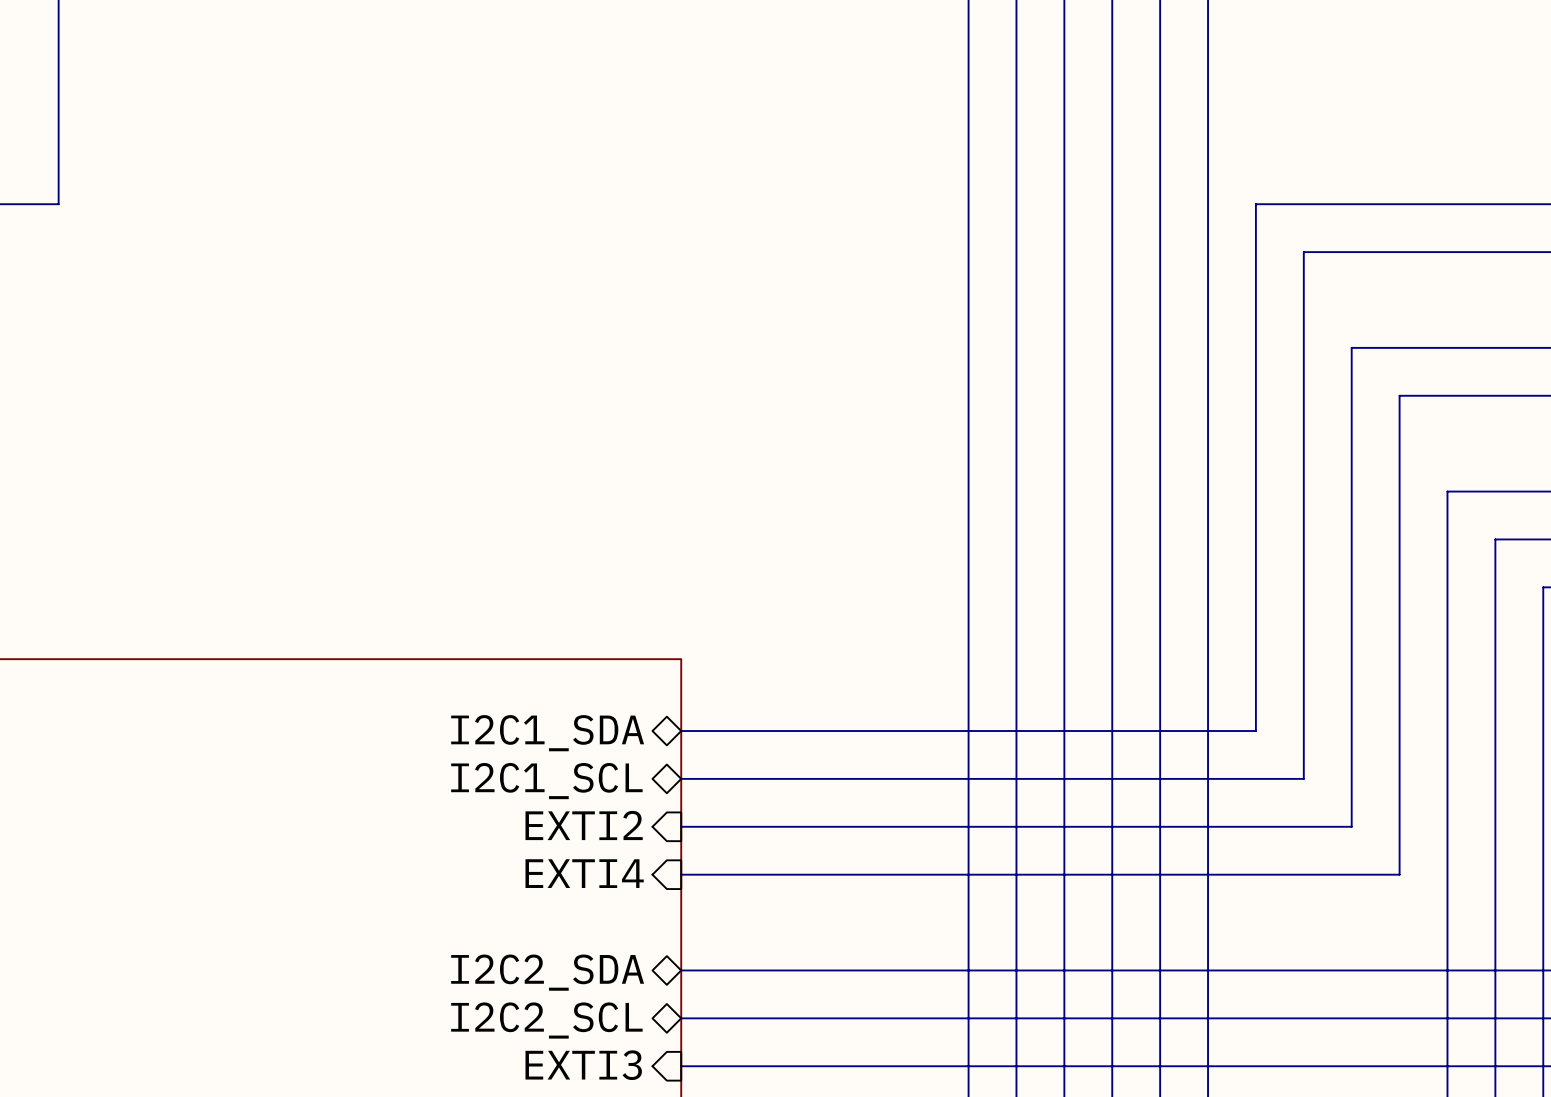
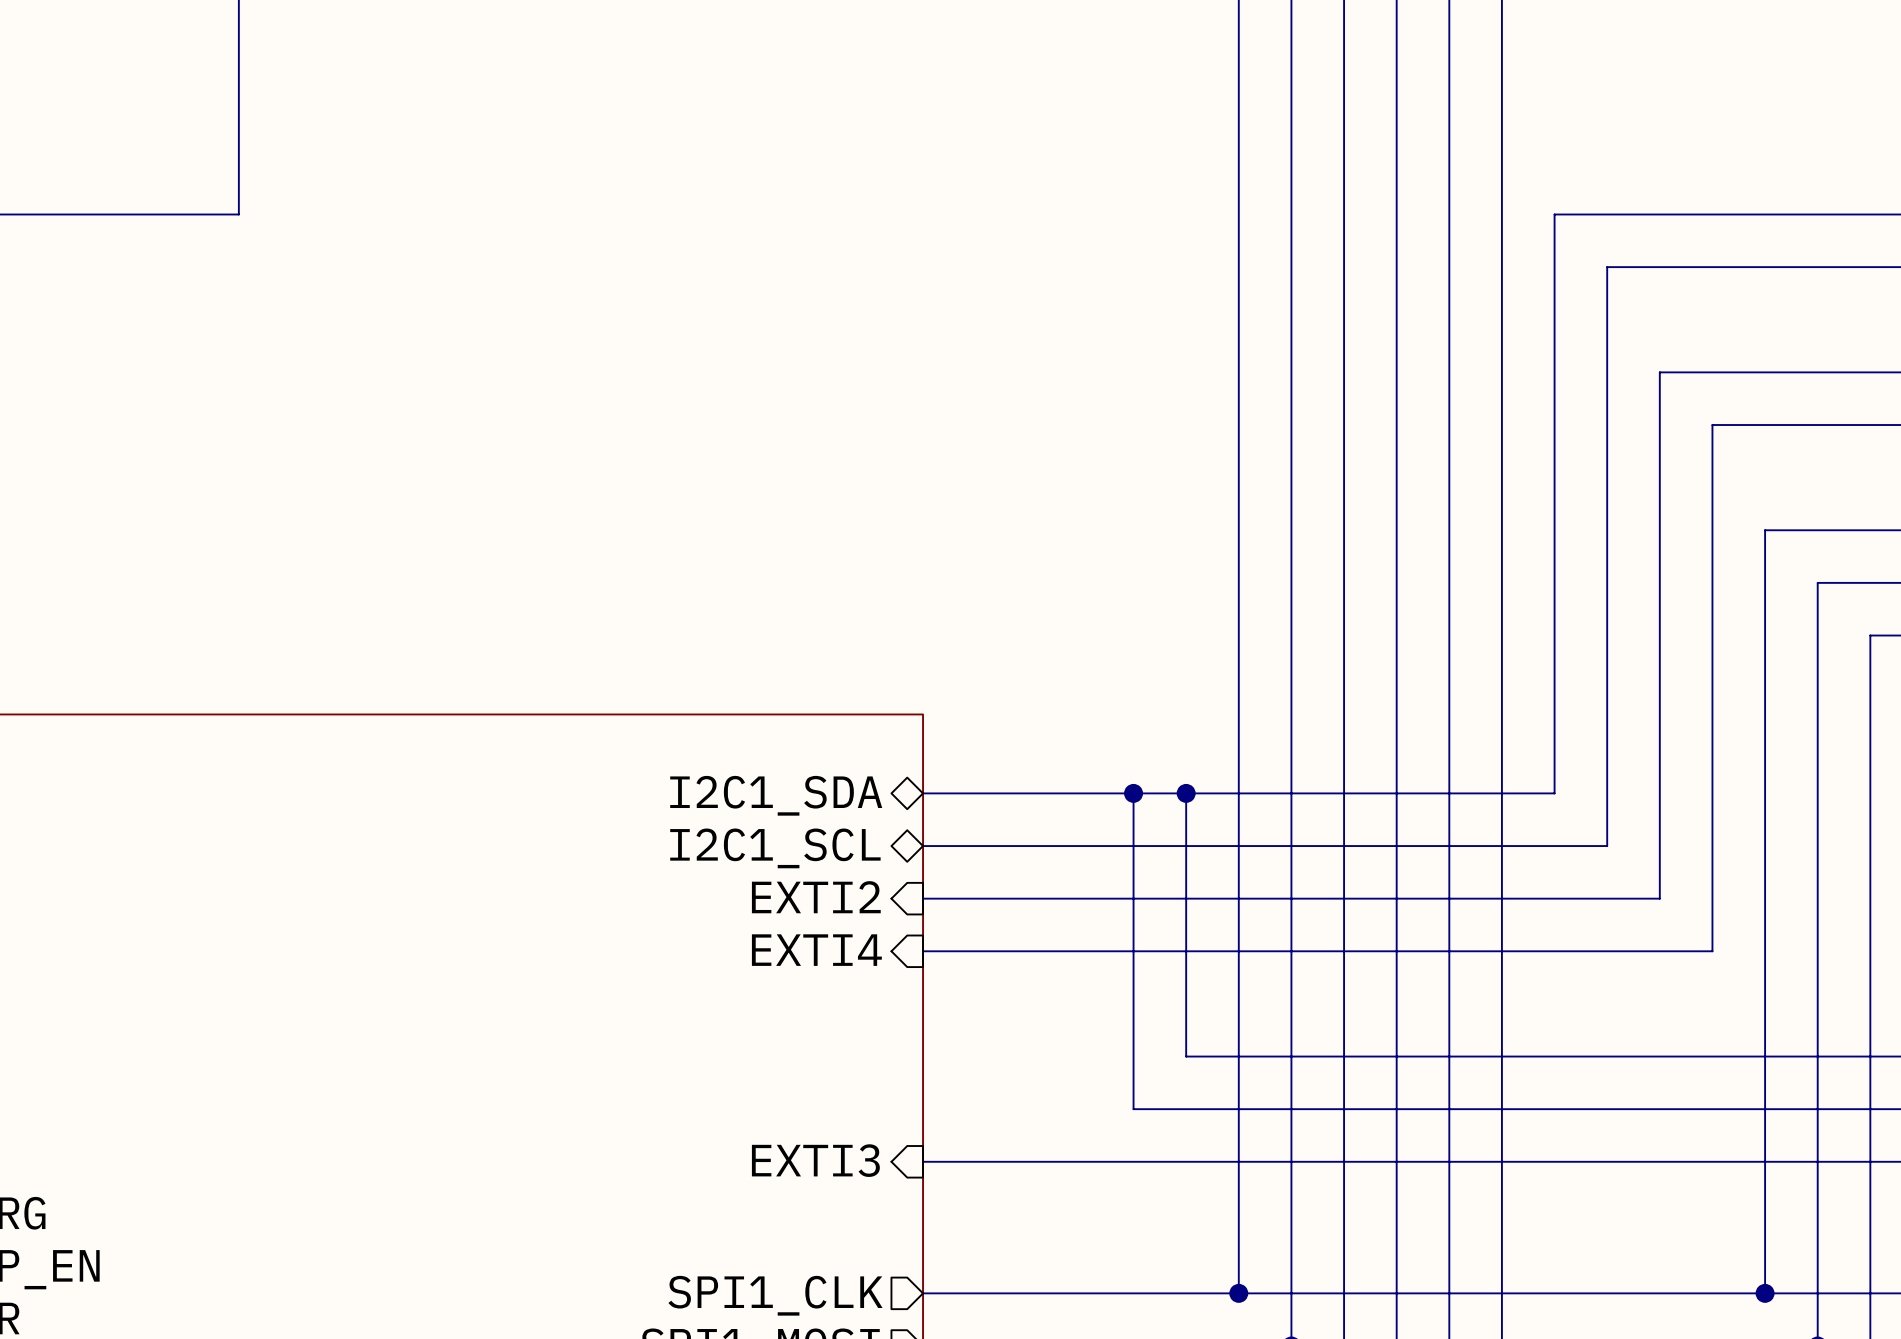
junction: none -> (1133, 793)
junction: none -> (1186, 793)
wire: (681, 970) (920, 970) -> (1186, 793) (1186, 1056)
sheet pin: I2C2_SDA (547, 972) -> none
wire: (681, 1018) (872, 1018) -> (1133, 793) (1133, 1109)
sheet pin: I2C2_SCL (546, 1020) -> none

